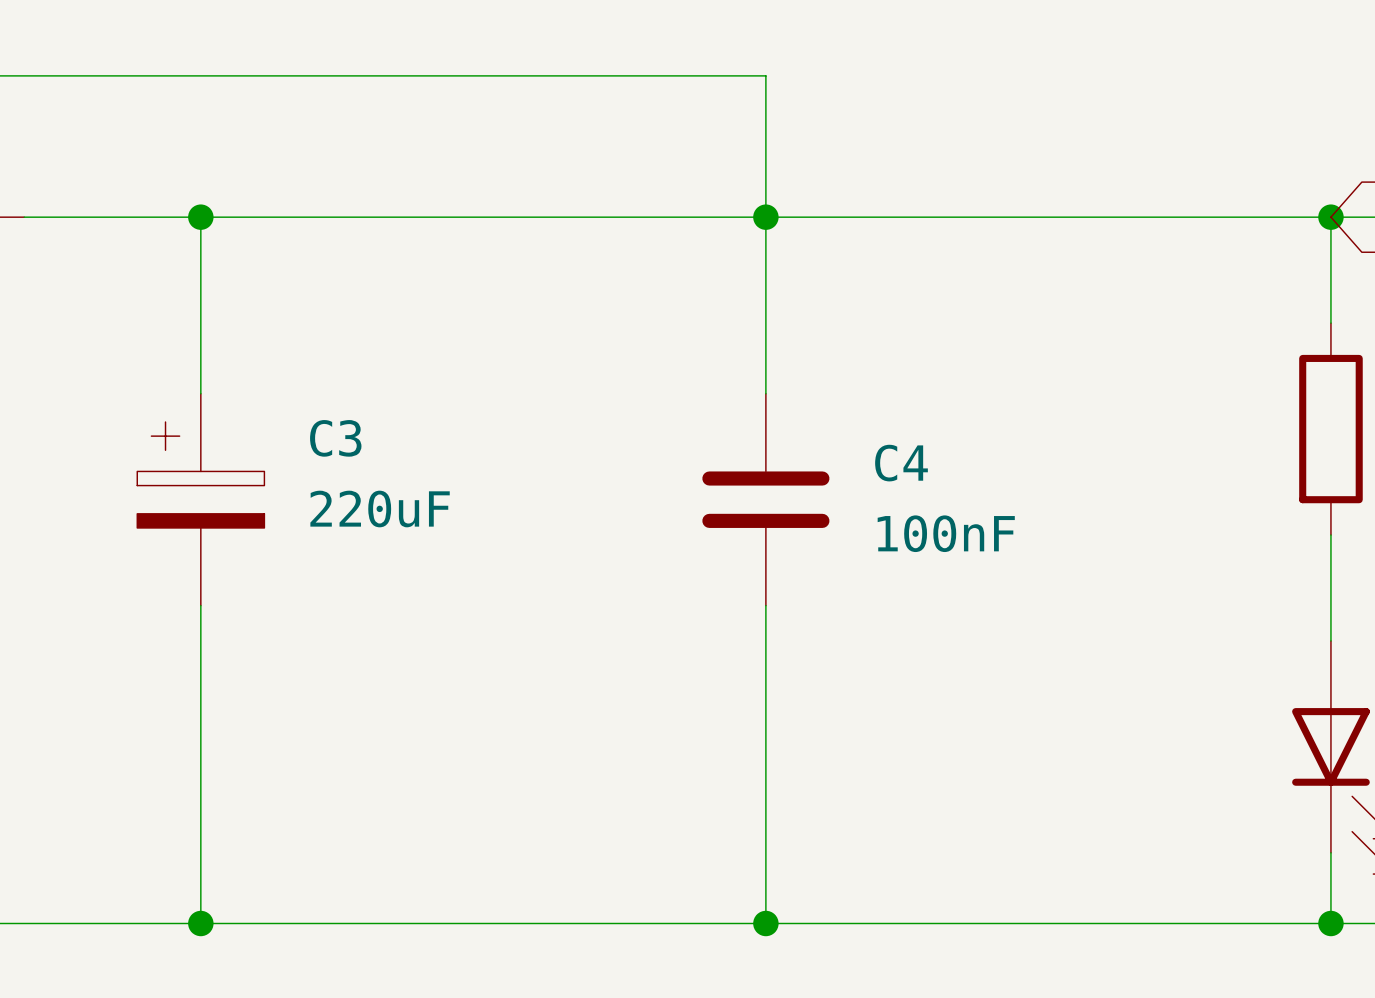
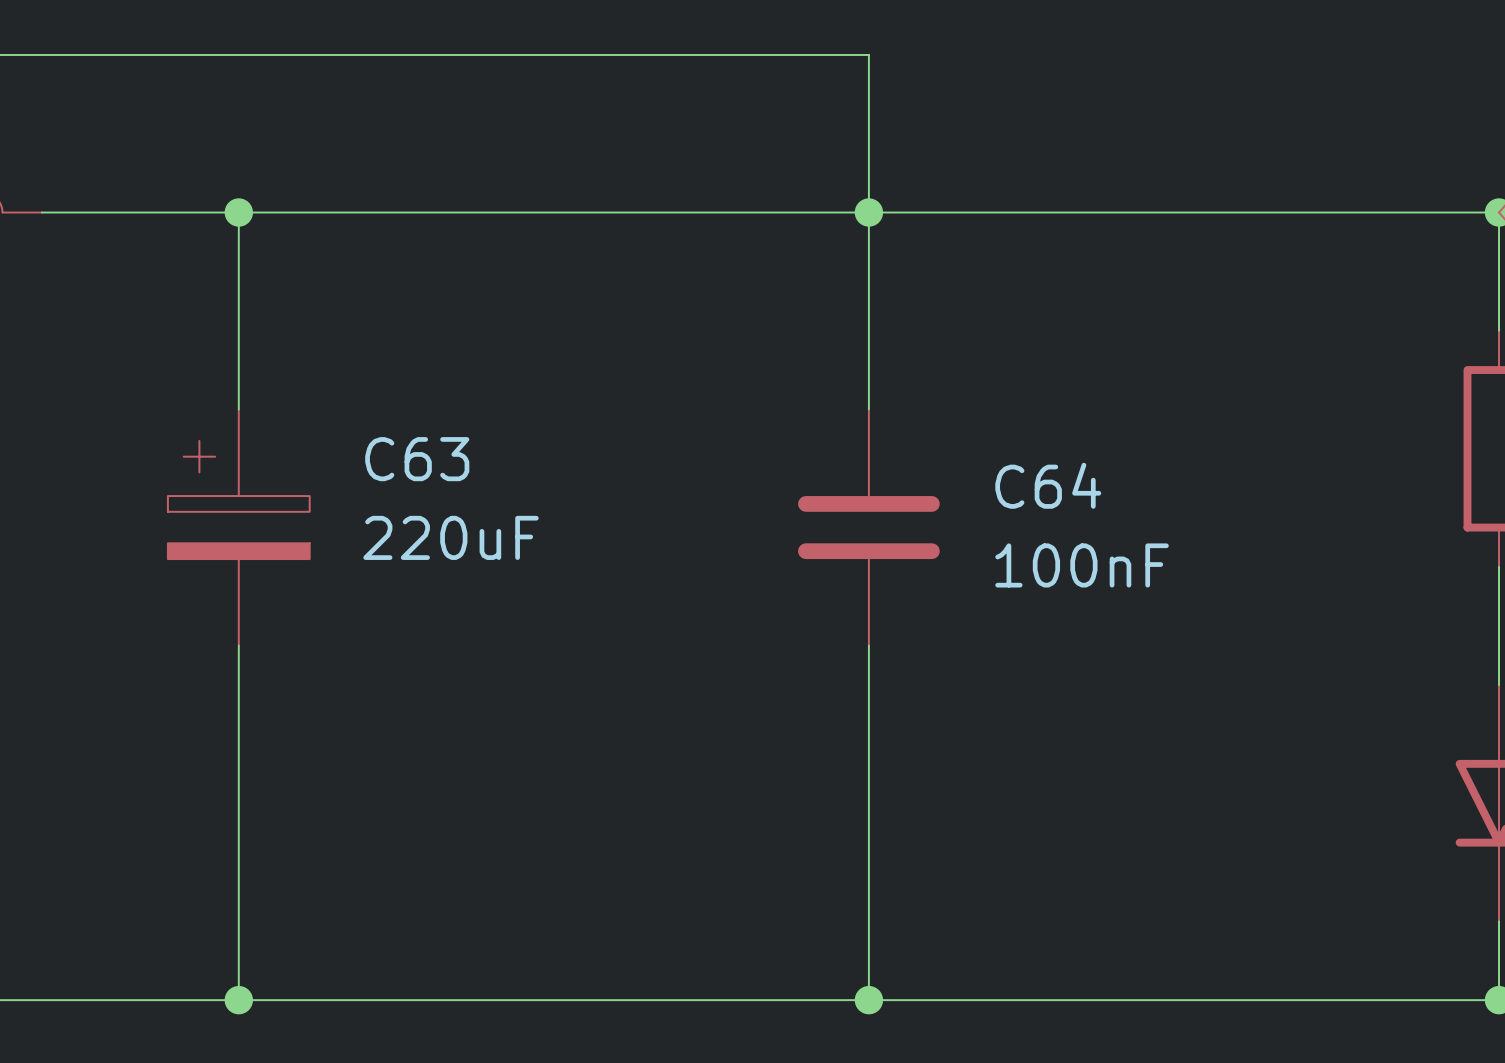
C3 name: C3 (335, 438) -> C63 (417, 459)
C4 name: C4 (901, 463) -> C64 (1048, 485)

